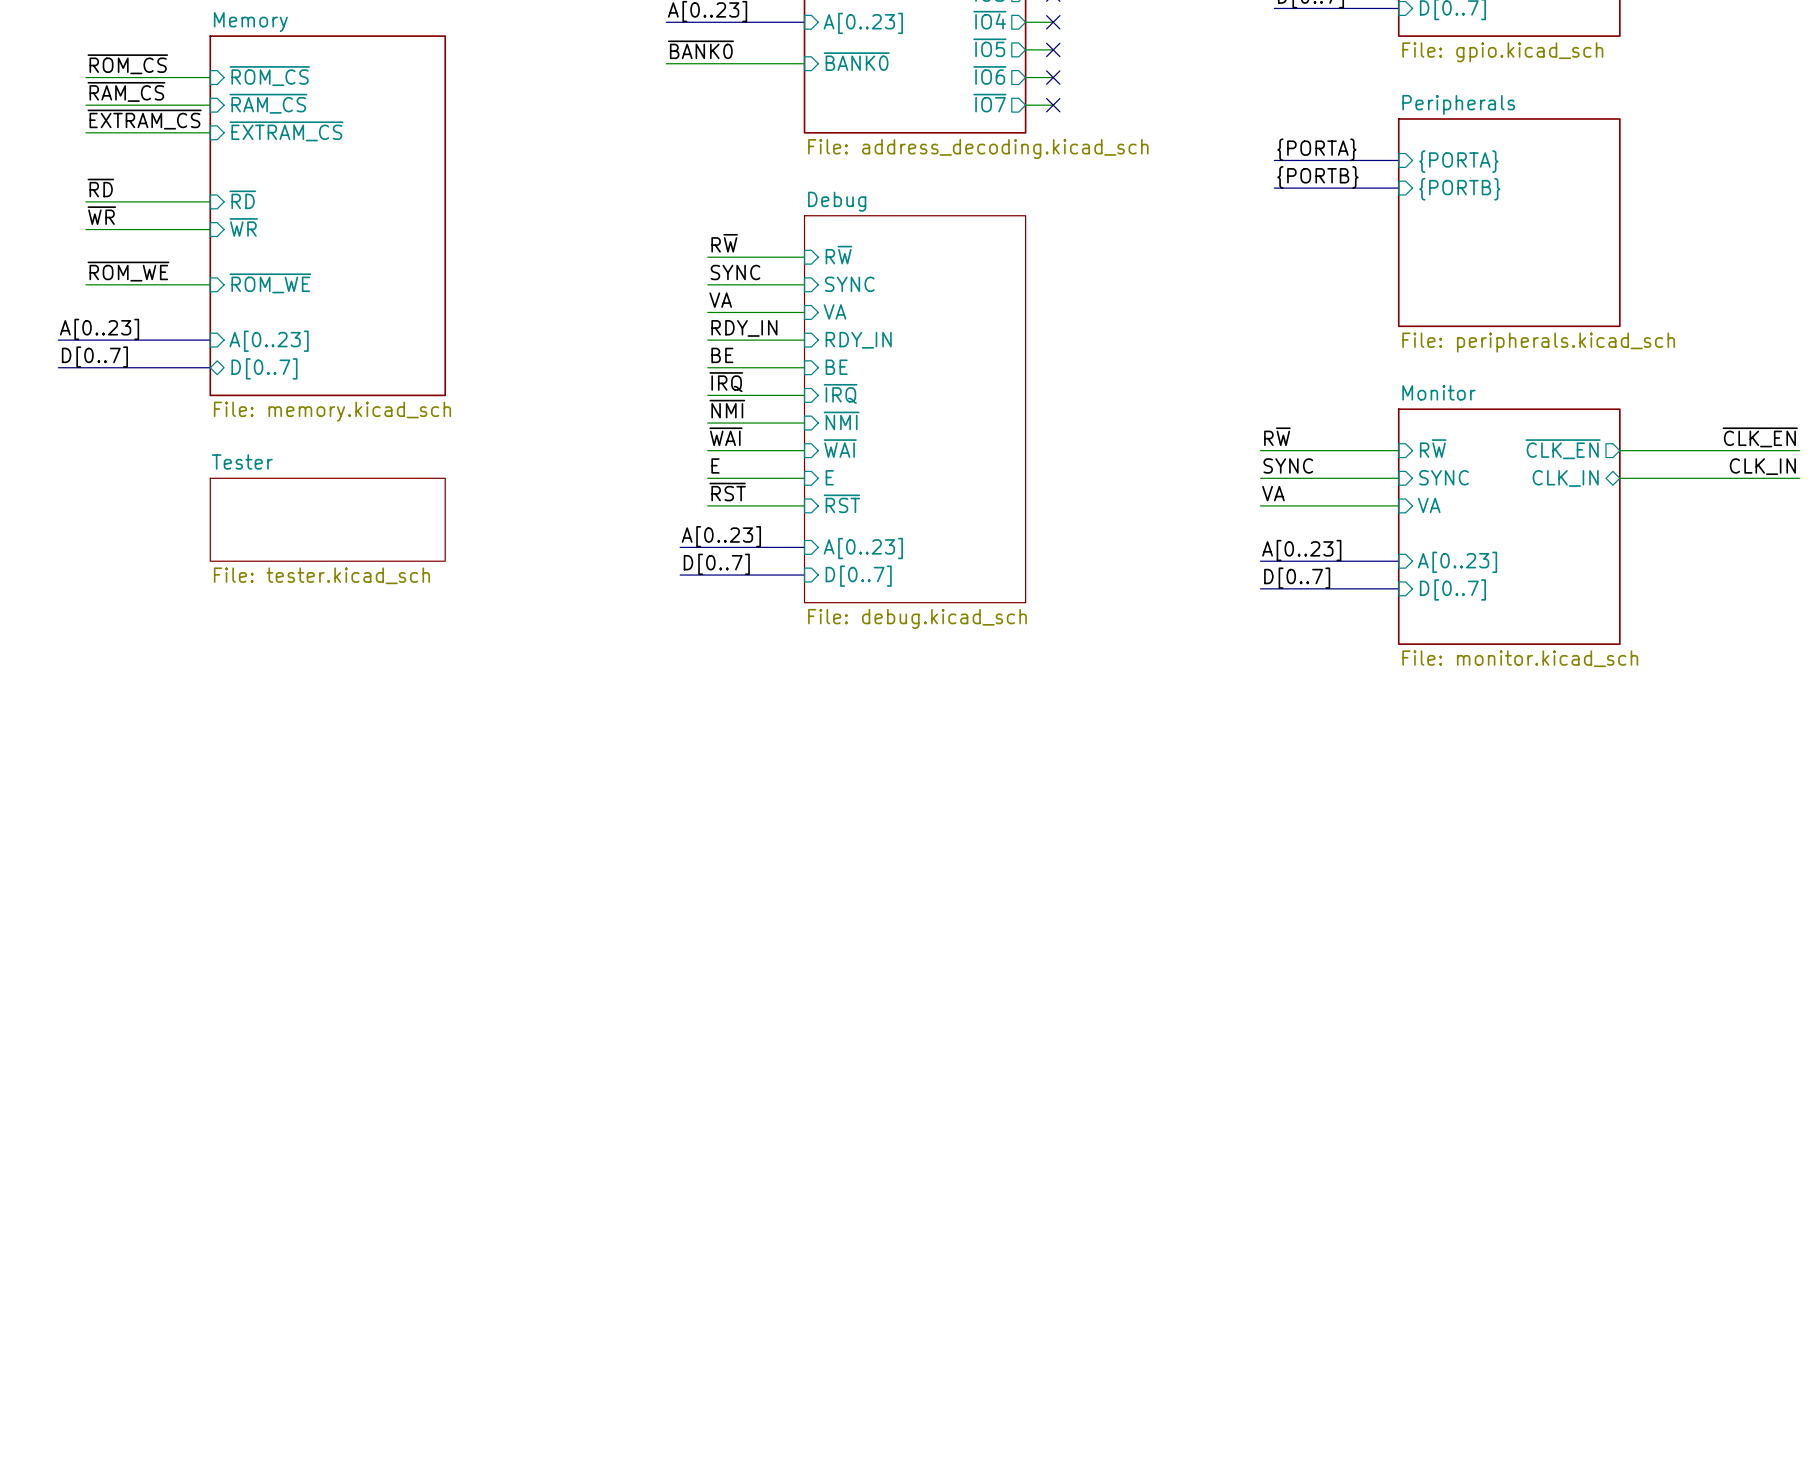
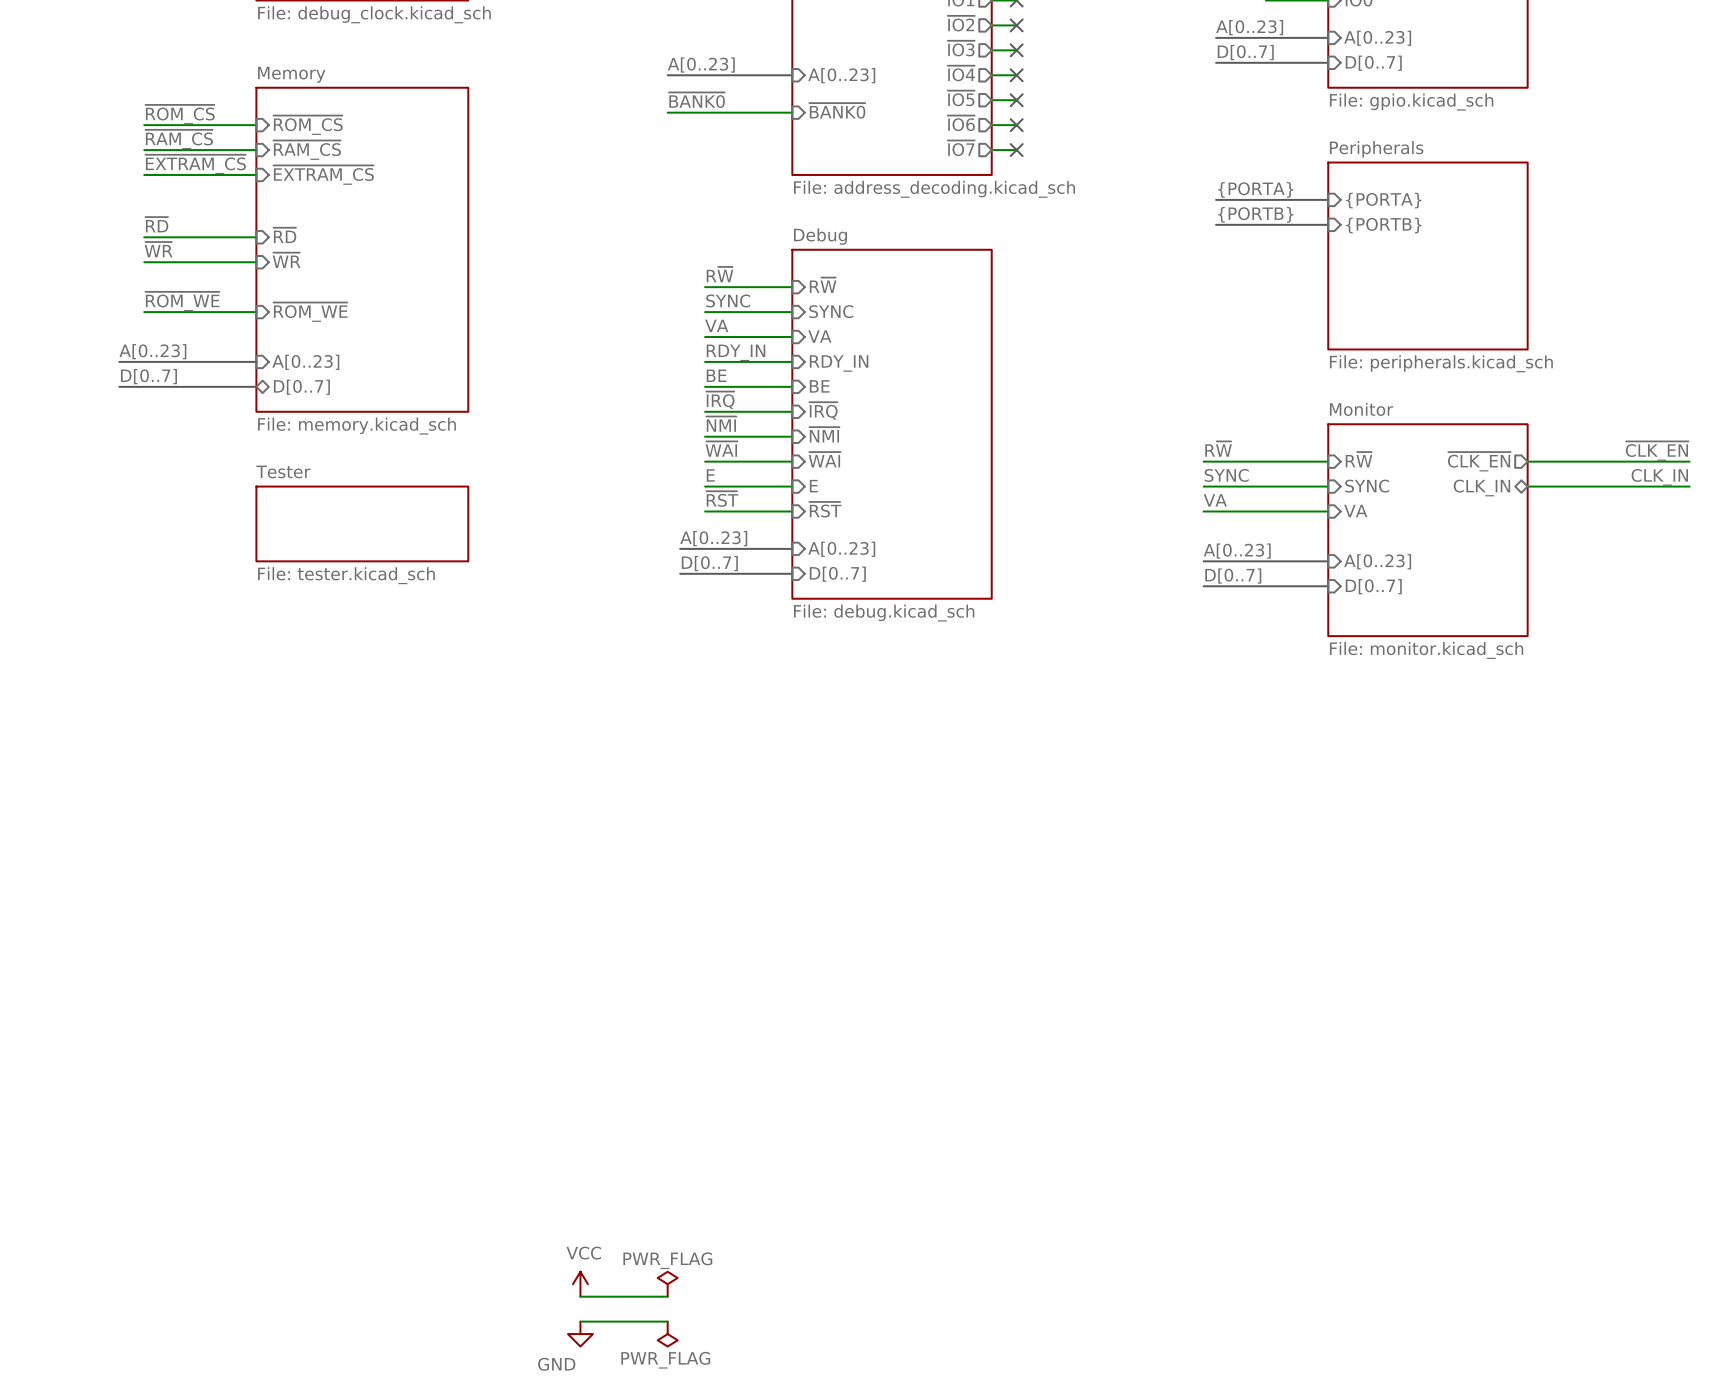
power symbol: none -> VCC (580, 1284)
power symbol: none -> PWR_FLAG (667, 1284)
wire: none -> (580, 1296) (667, 1296)
wire: none -> (580, 1321) (667, 1321)
power symbol: none -> GND (580, 1334)
power symbol: none -> PWR_FLAG (667, 1334)

